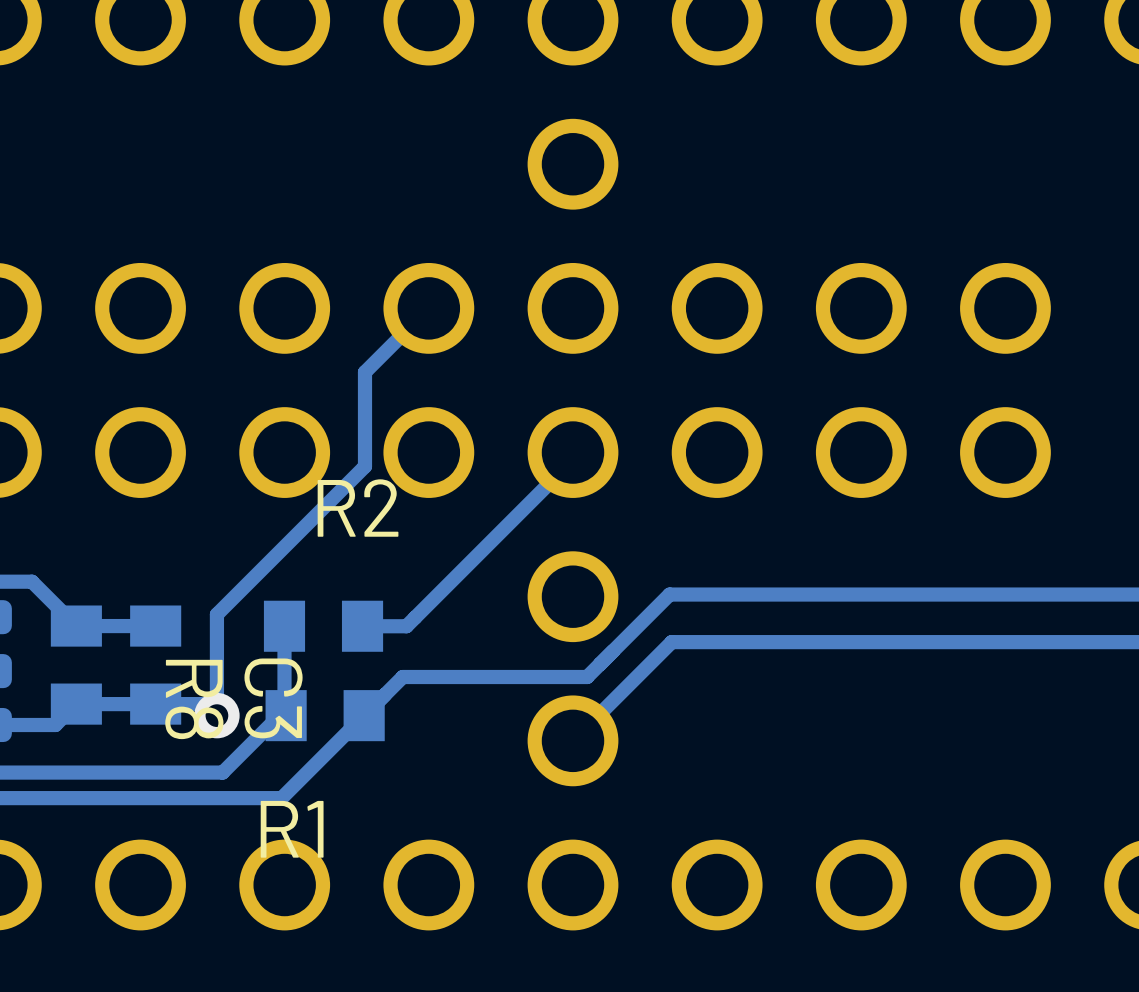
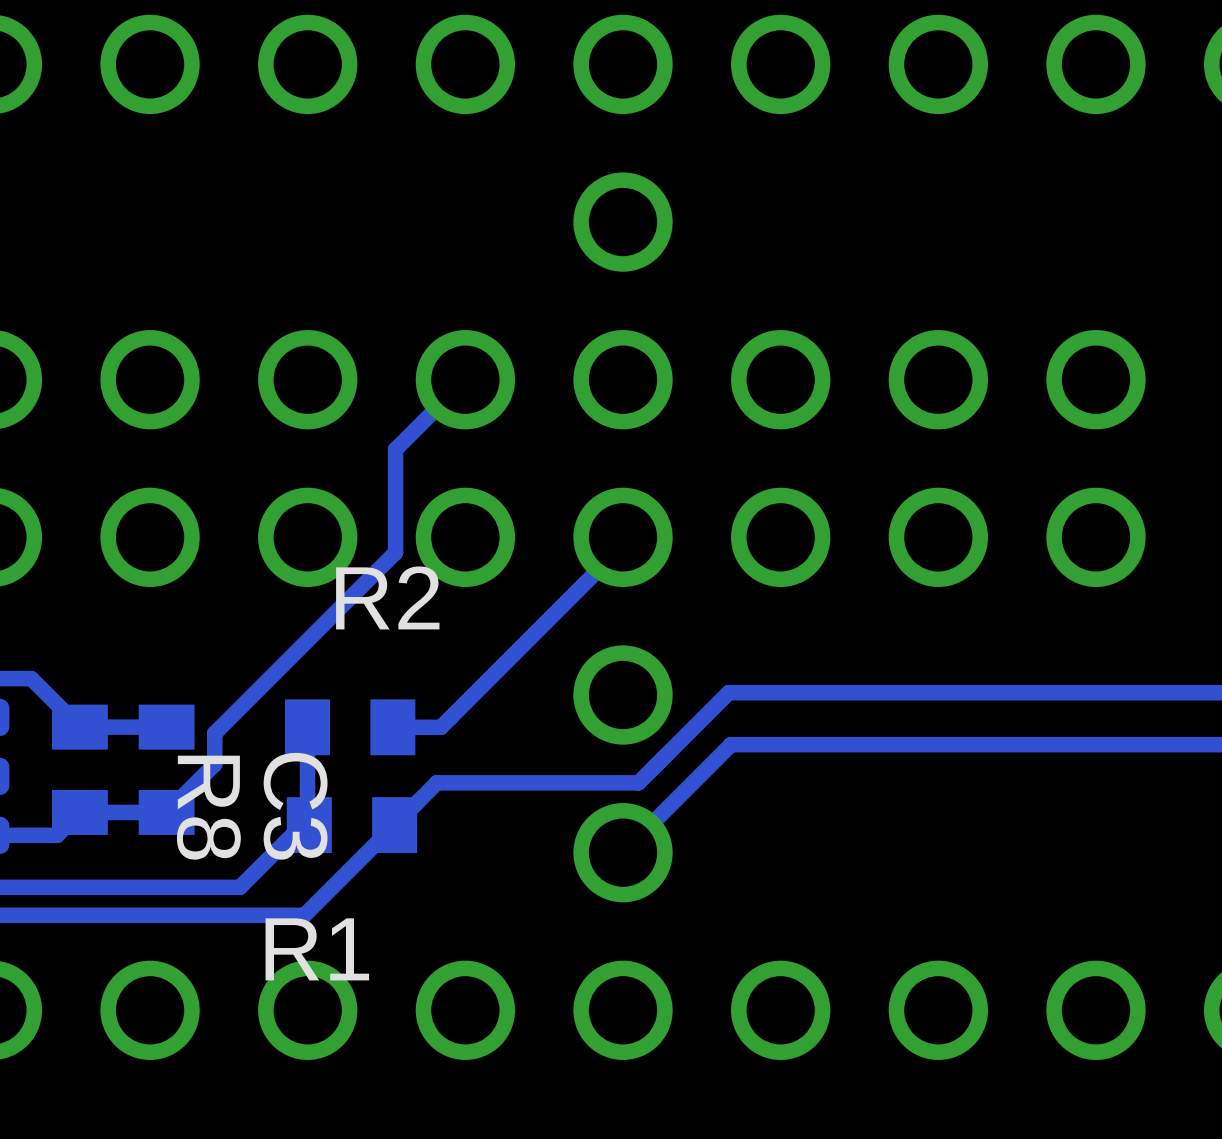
track: (216, 614) (216, 715) (205, 704) (155, 704) -> (233, 714) (214, 733) (214, 764) (166, 812)
via: (216, 715) -> none

